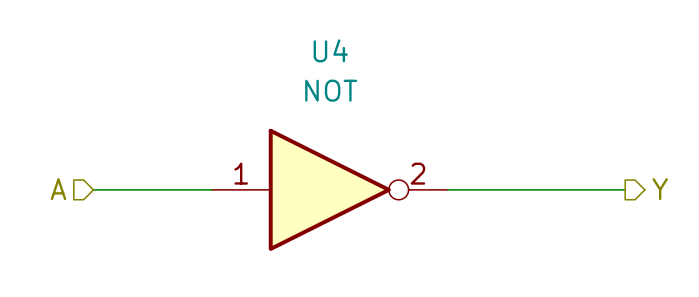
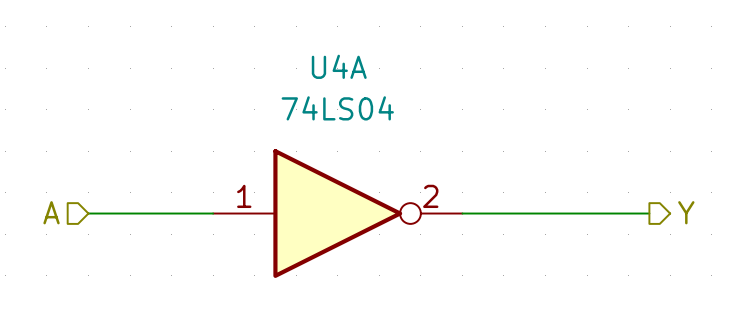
U4 name: U4 (330, 50) -> U4A (339, 66)
U4 value: NOT (331, 90) -> 74LS04 (337, 108)

